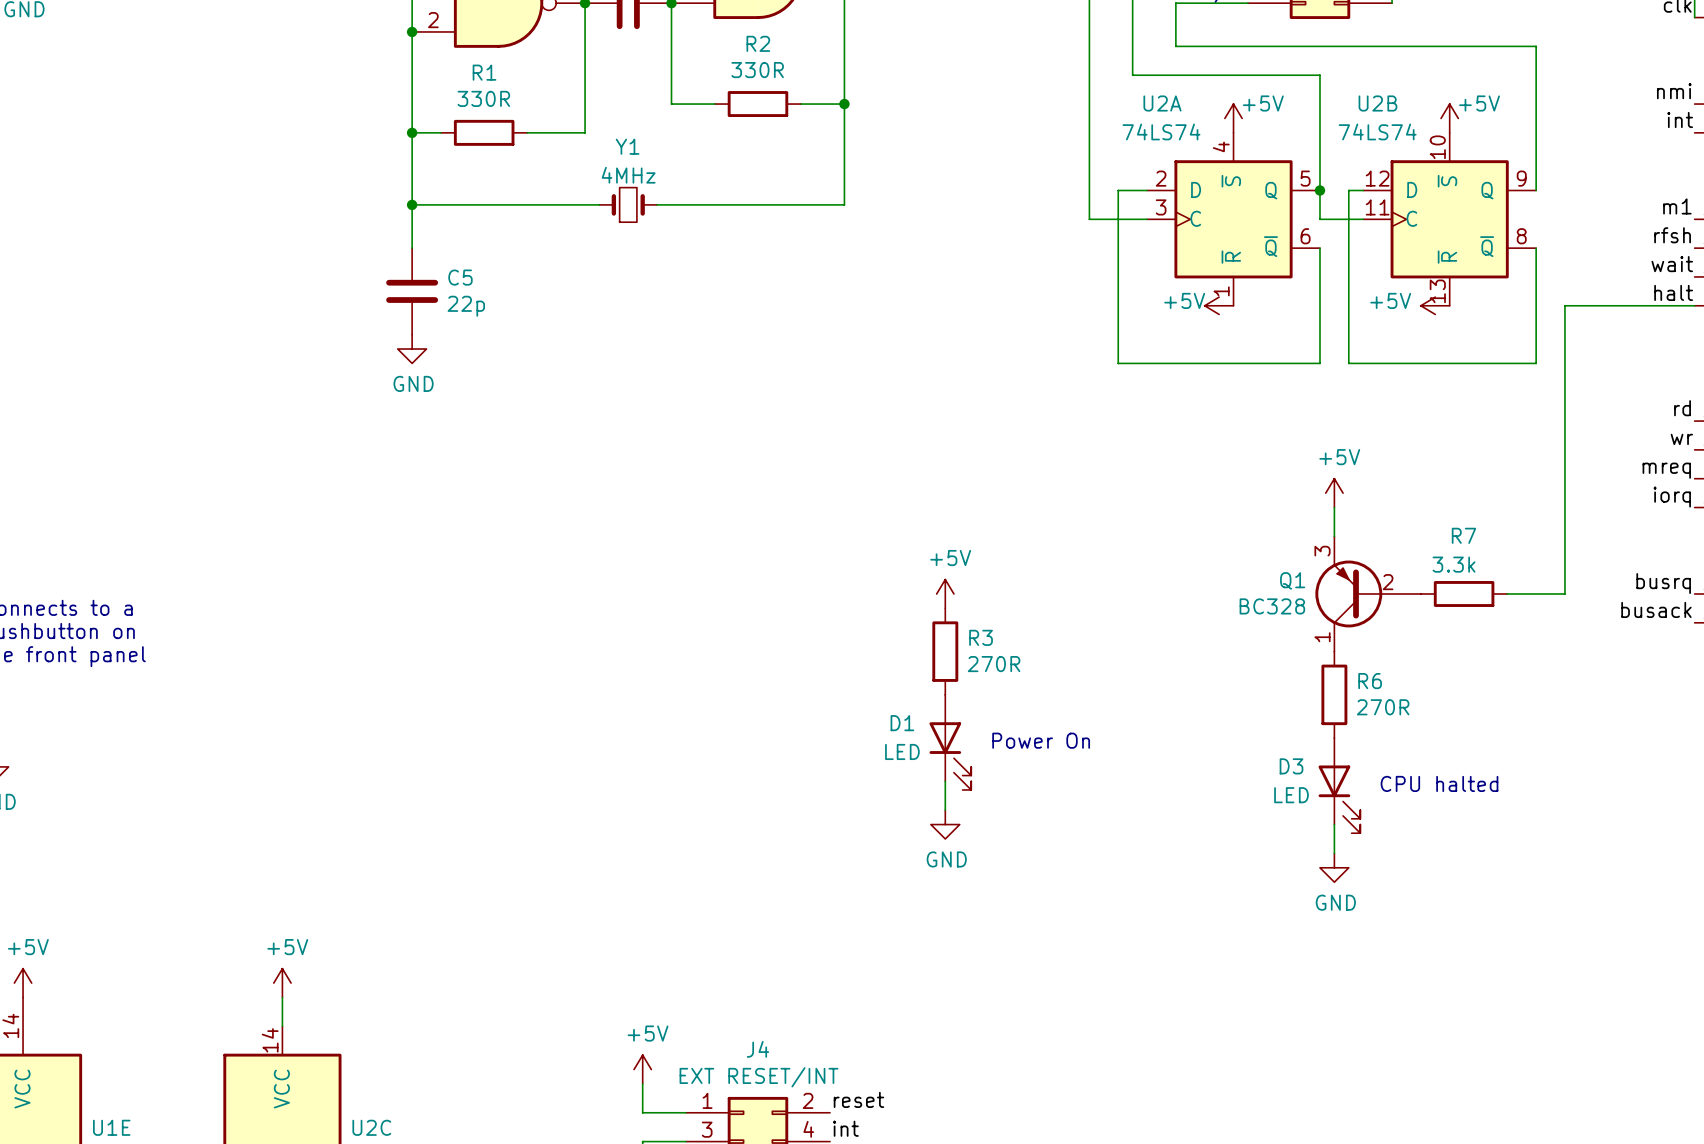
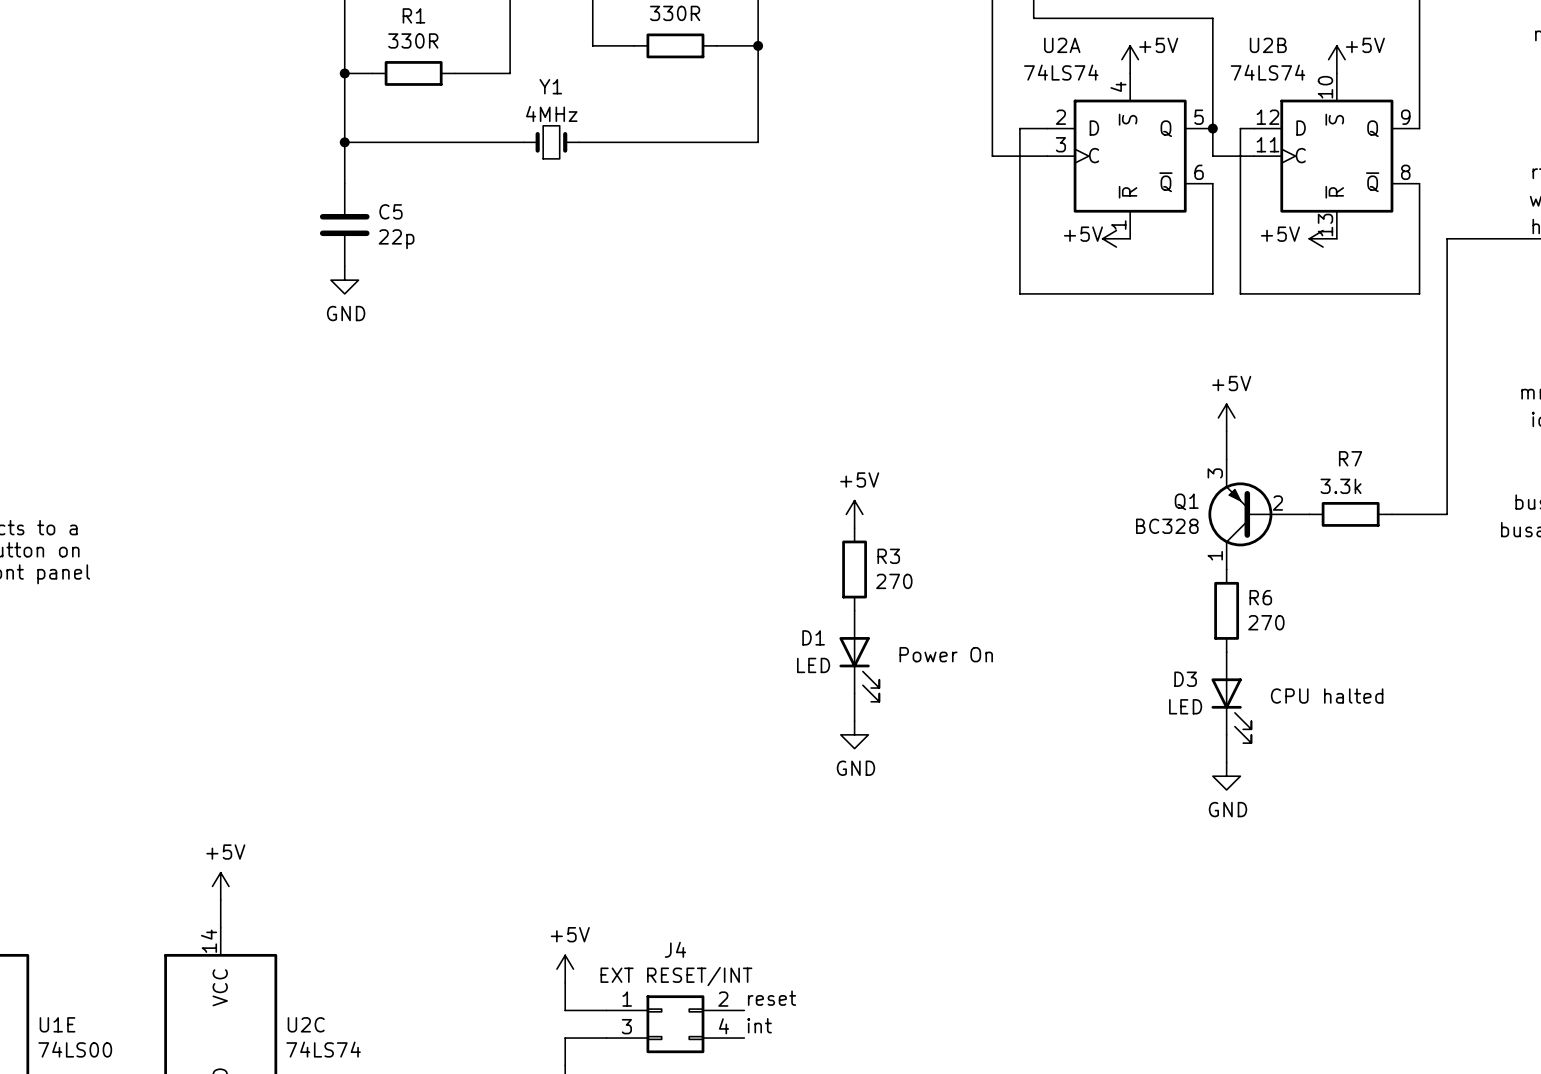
R3 value: 270R (994, 664) -> 270 (894, 581)
R6 value: 270R (1383, 707) -> 270 (1266, 622)

